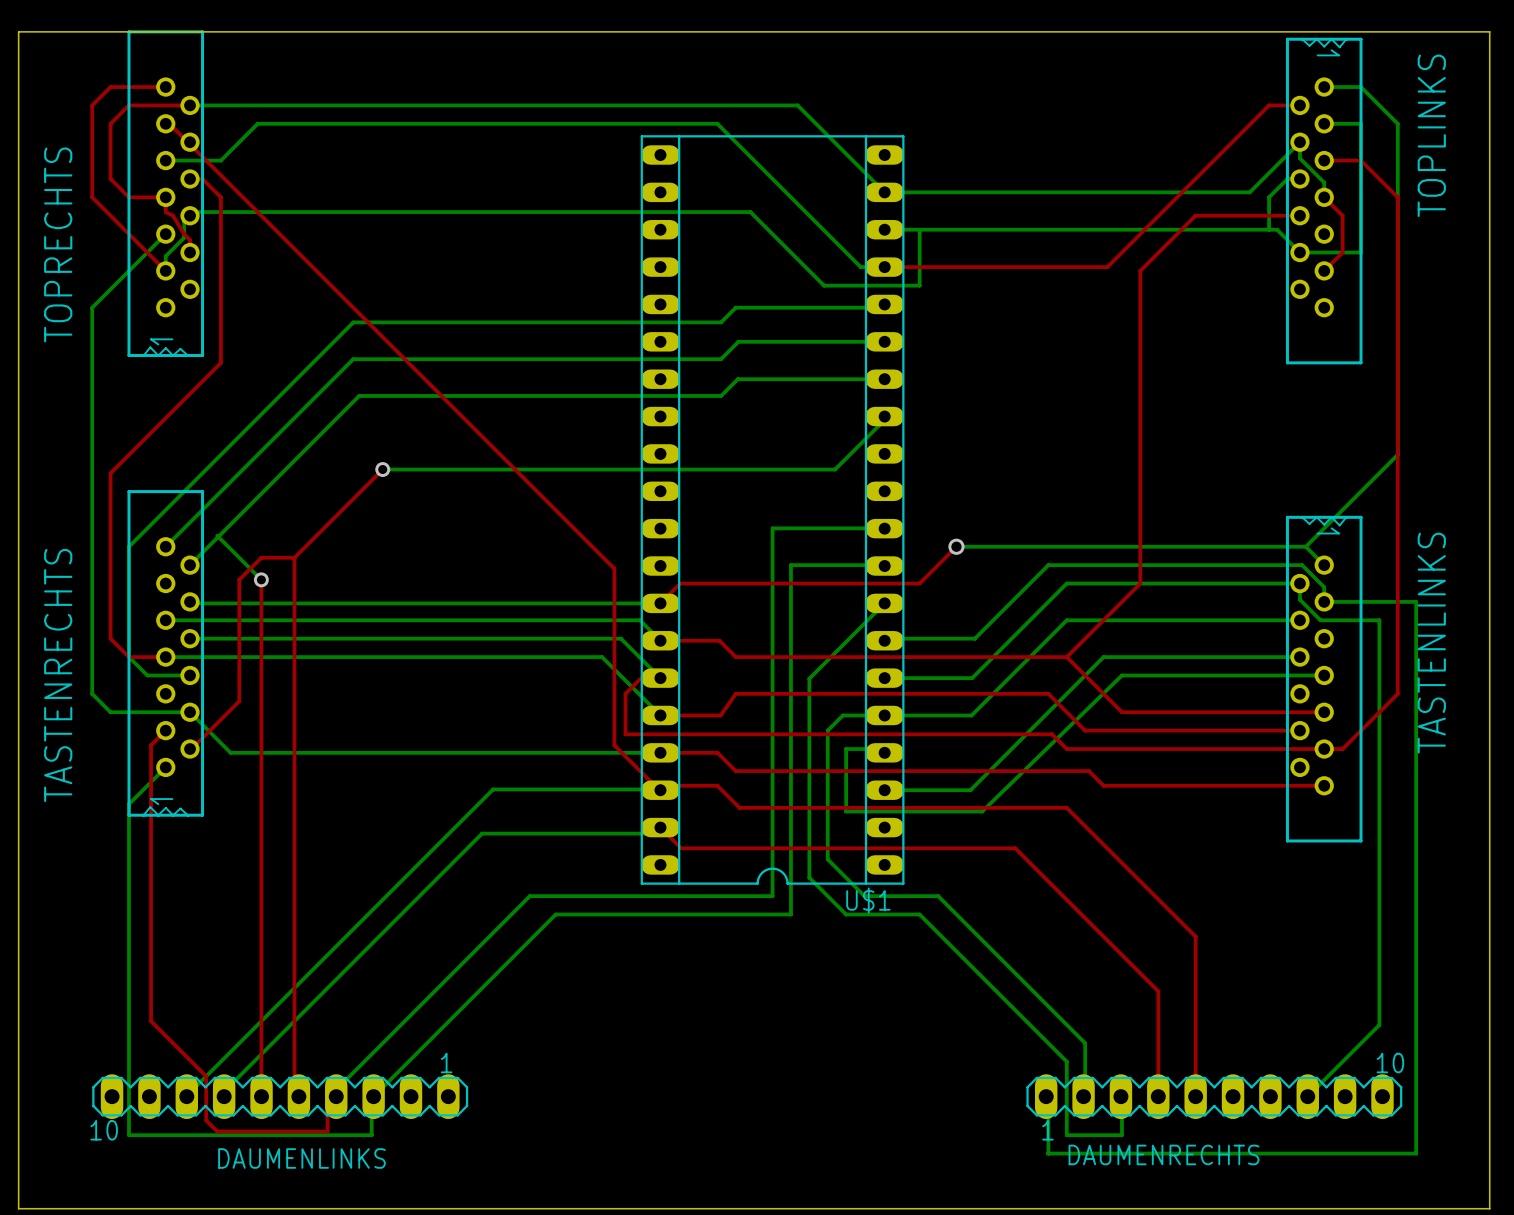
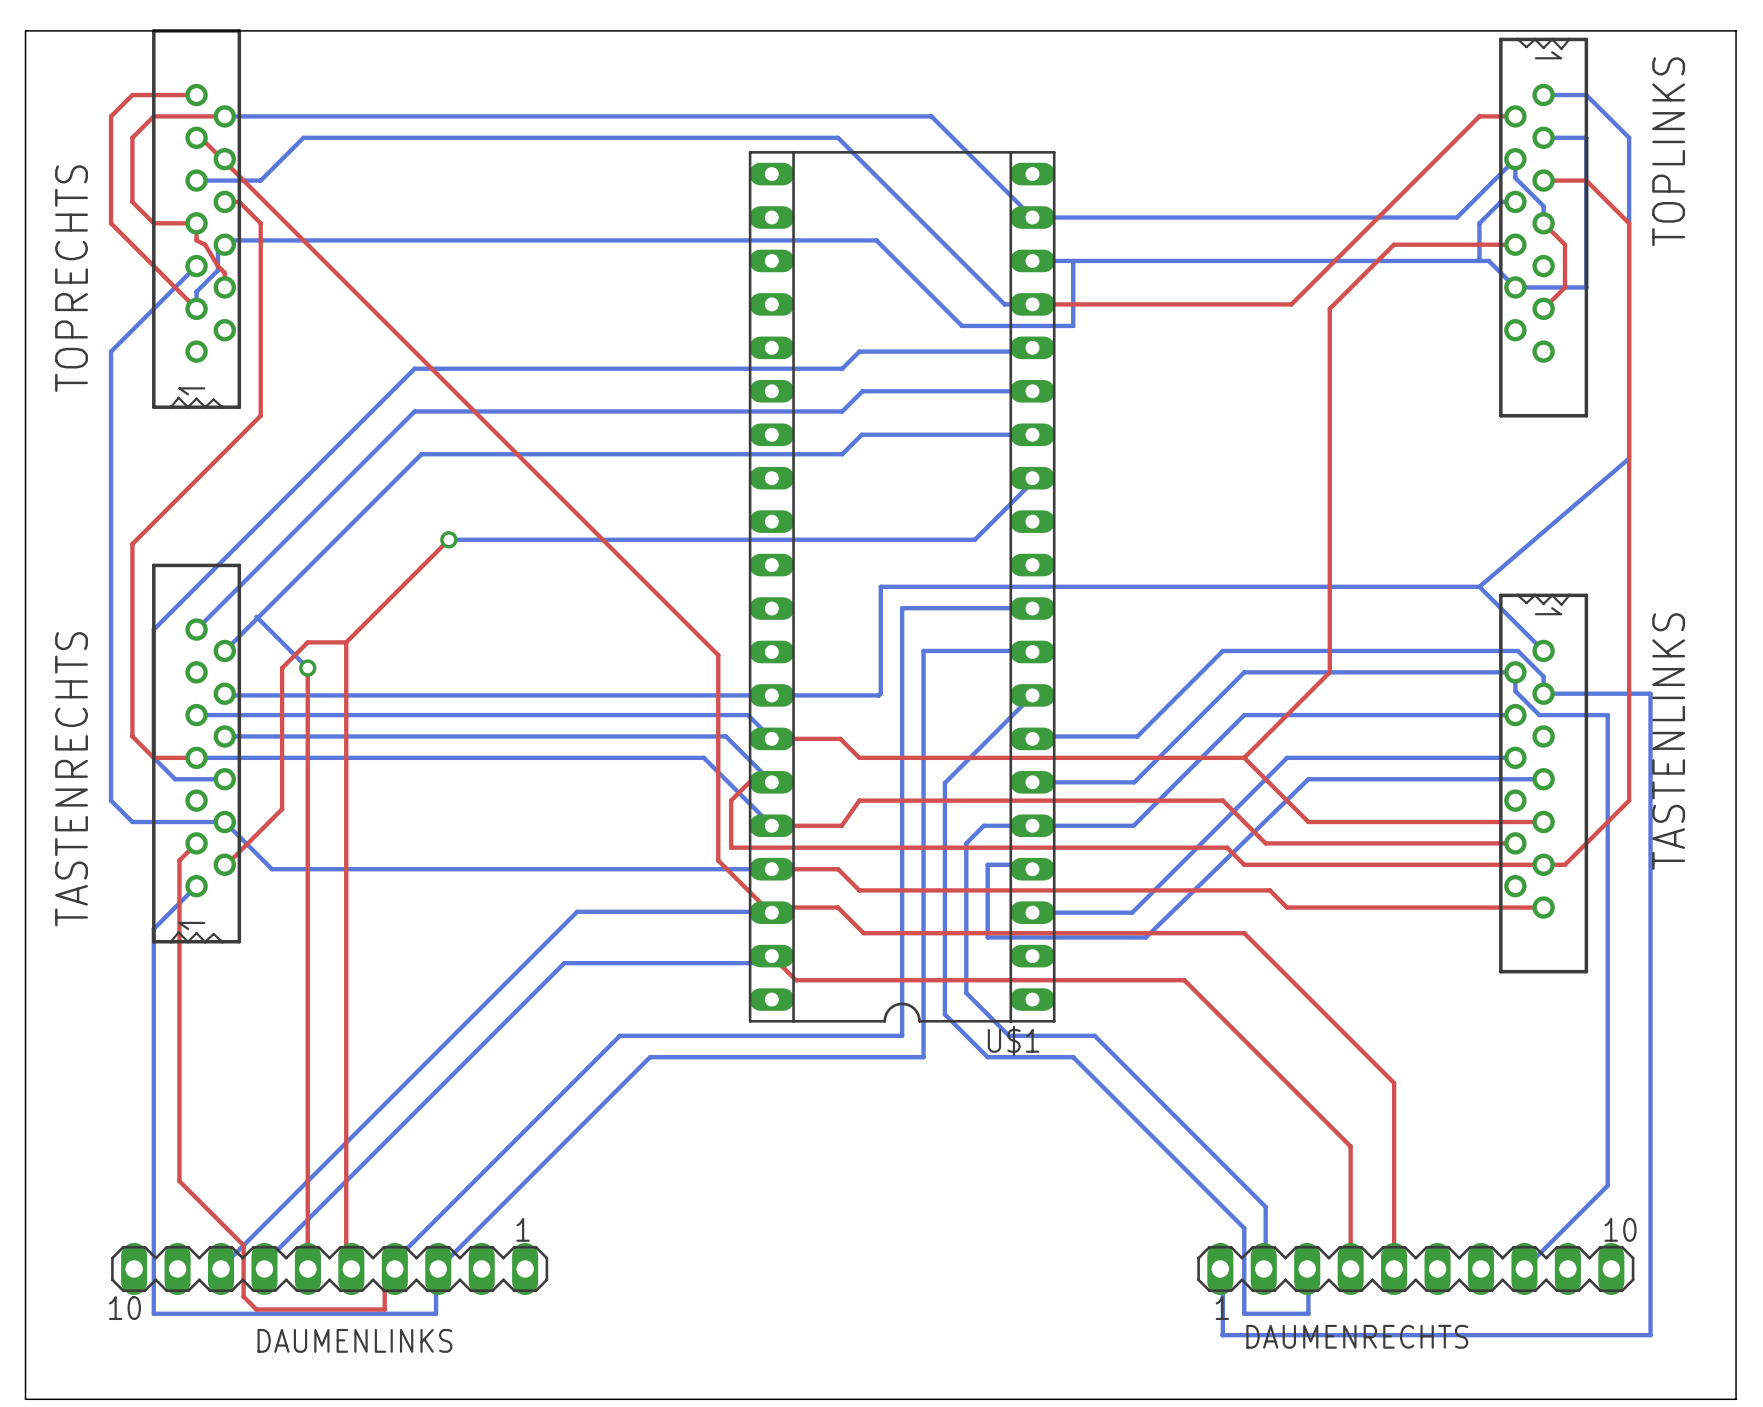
bottom track: (1397, 399) (1397, 454) (1305, 546) (956, 546) -> (1629, 458) (1479, 586)
bottom track: none -> (1479, 586) (1522, 629)
bottom track: none -> (1479, 586) (880, 586) (880, 693) (879, 695) (771, 695)
top track: (956, 546) (919, 583) (680, 583) (660, 603) -> none
via: (956, 546) -> none

